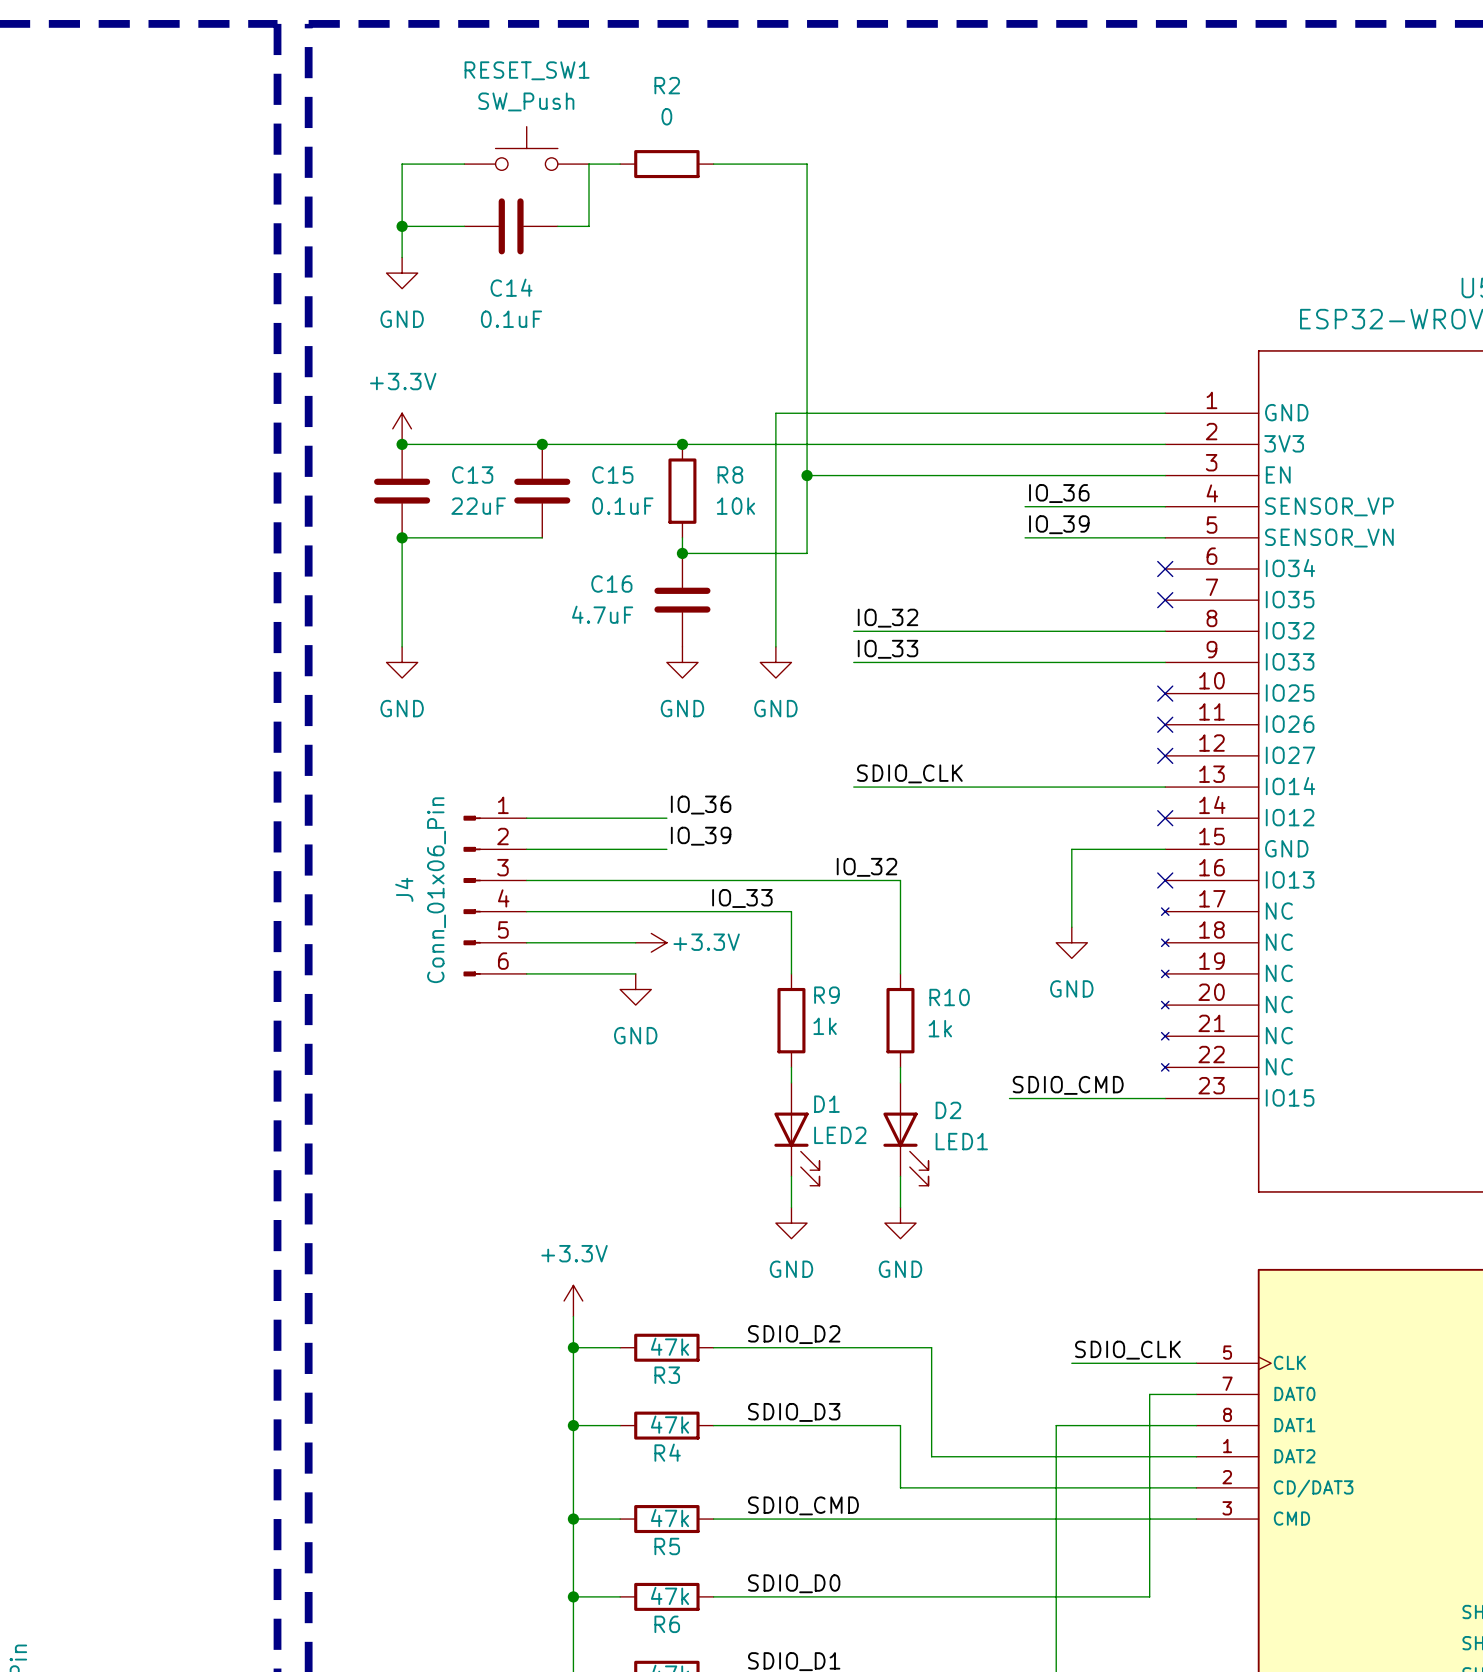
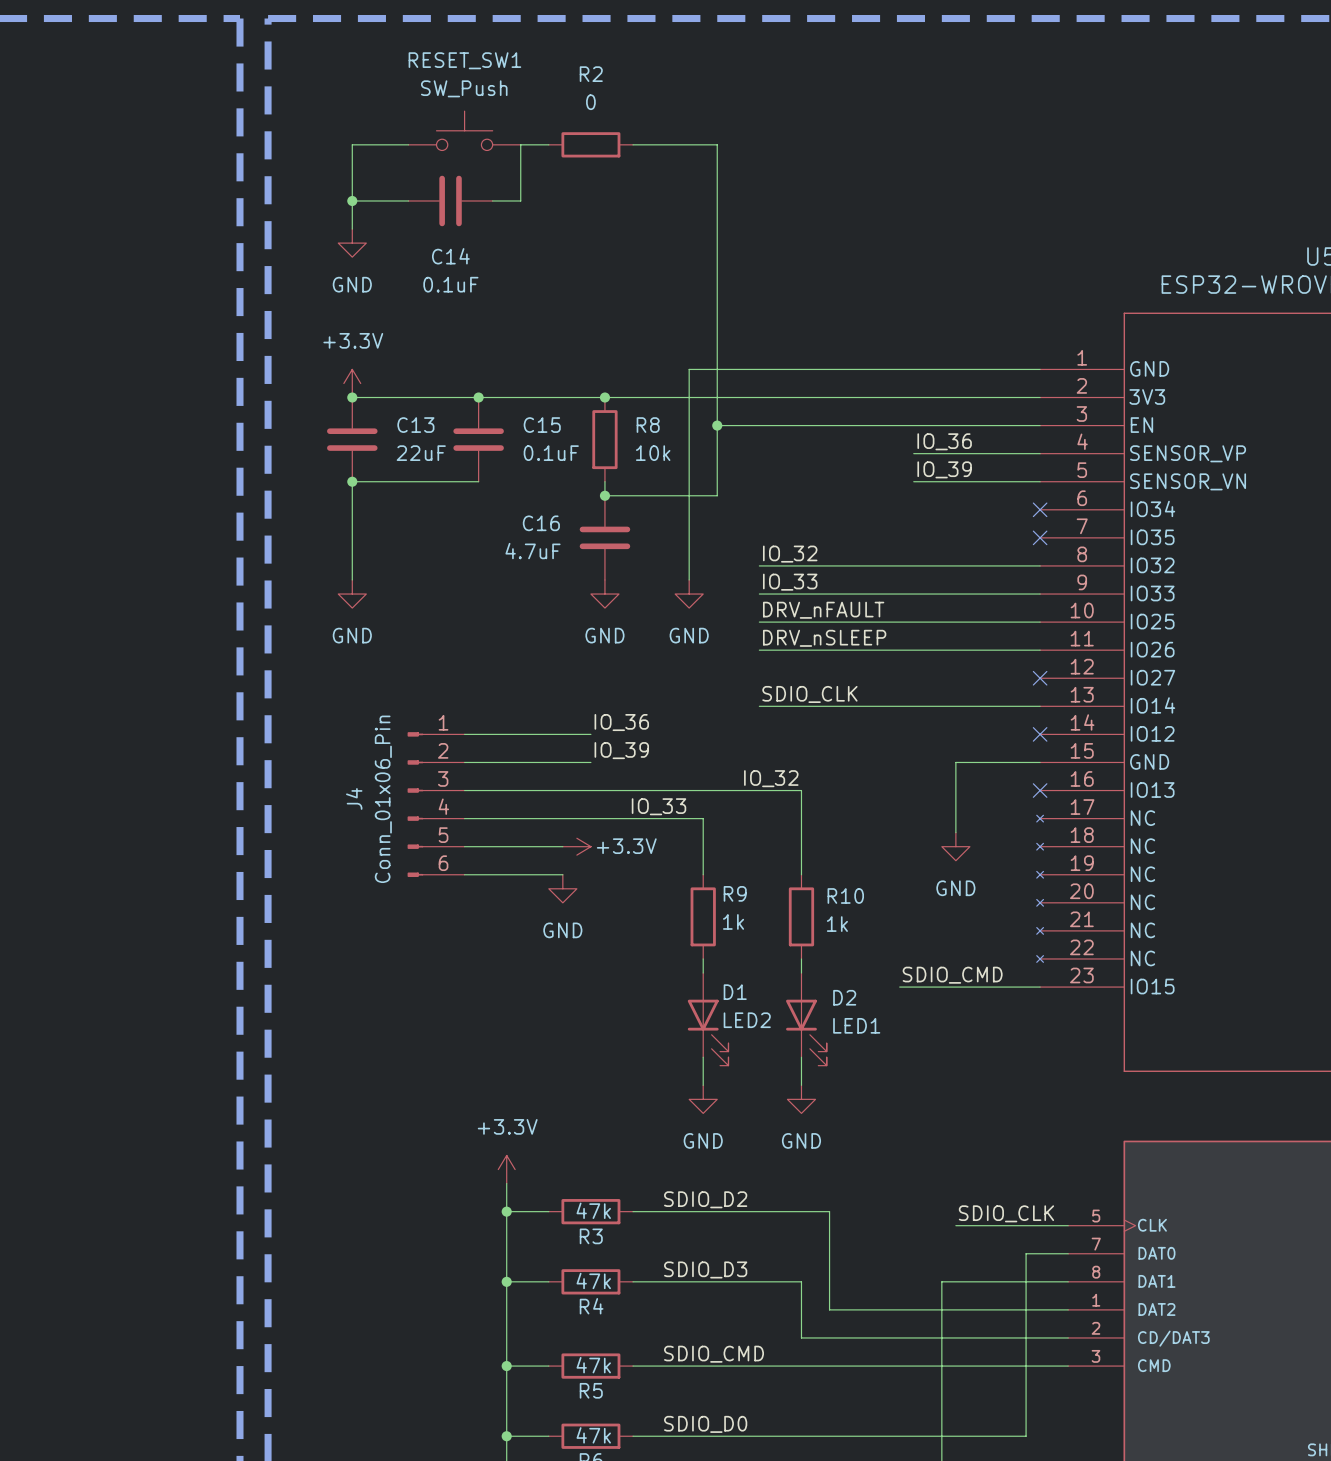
label: none -> DRV_nFAULT (823, 610)
wire: none -> (759, 622) (1040, 622)
no-connect mark: (1165, 693) -> none
label: none -> DRV_nSLEEP (824, 638)
wire: none -> (759, 650) (1040, 650)
no-connect mark: (1165, 724) -> none

